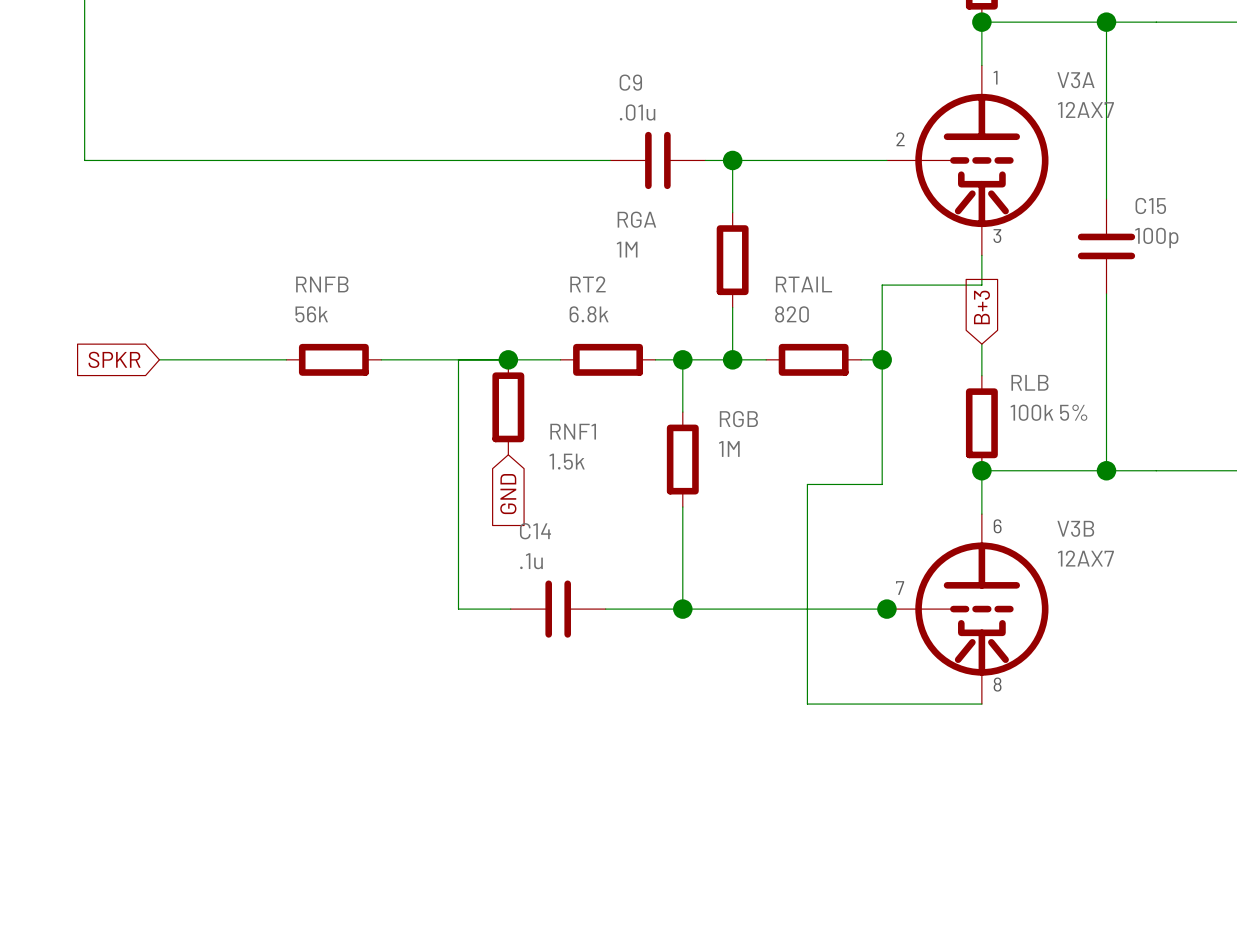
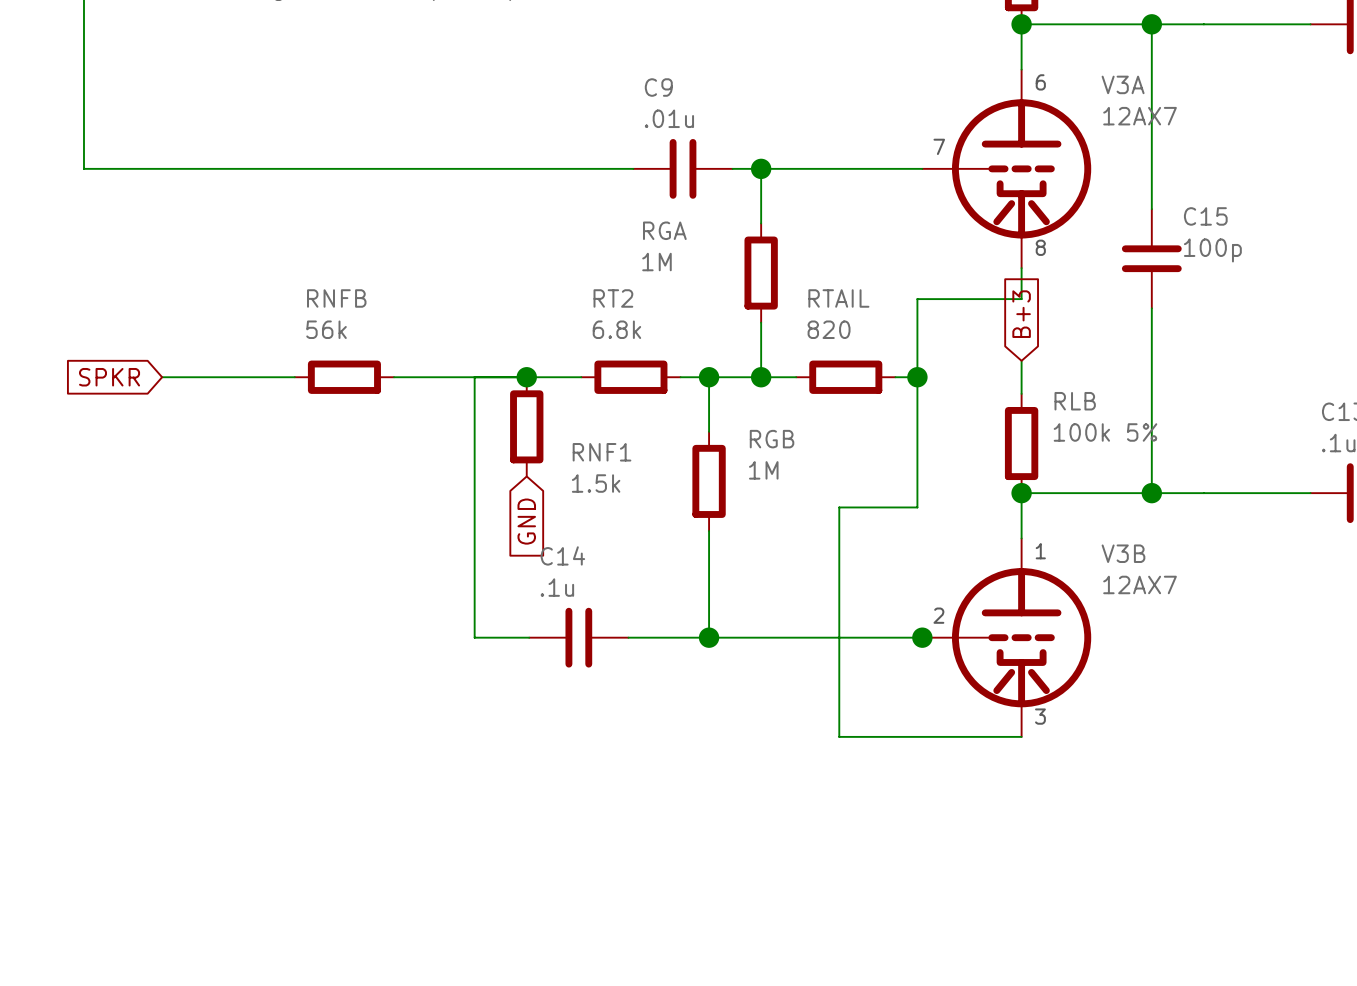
text: 1 (995, 77) -> 6 (1040, 82)
text: 2 (900, 139) -> 7 (939, 146)
text: 3 (997, 236) -> 8 (1040, 247)
text: 6 (997, 526) -> 1 (1040, 551)
text: 7 (900, 588) -> 2 (938, 615)
text: 8 (997, 684) -> 3 (1040, 716)

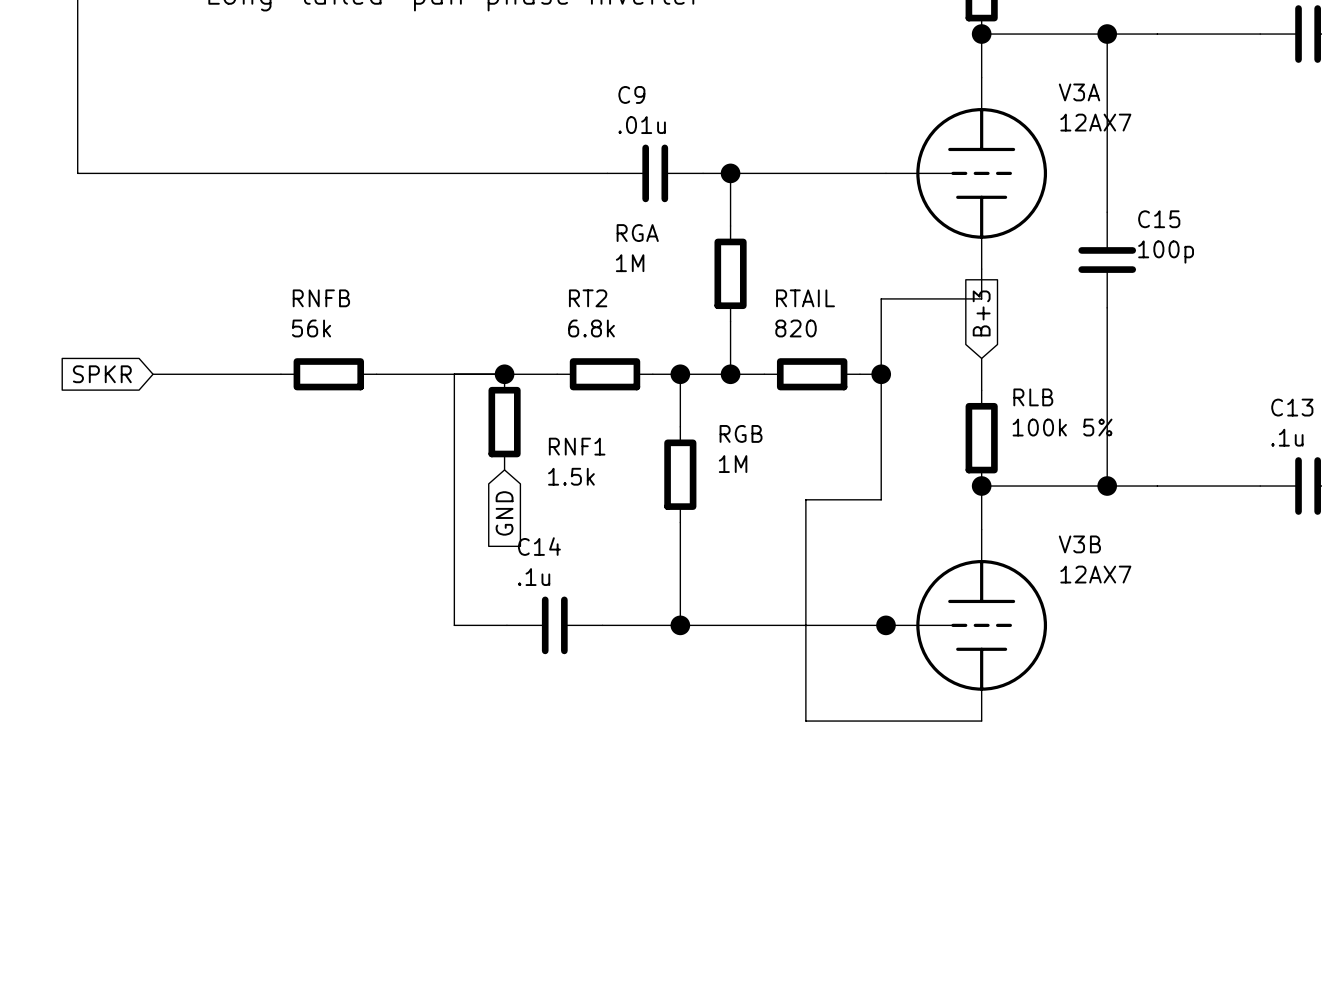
V3A symbol: [922, 69, 1092, 269] -> [885, 77, 1048, 270]
text: 6 (1040, 82) -> none
text: 7 (939, 146) -> none
text: 8 (1040, 247) -> none
V3B symbol: [922, 538, 1092, 737] -> [885, 529, 1048, 722]
text: 1 (1040, 551) -> none
text: 2 (938, 615) -> none
text: 3 (1040, 716) -> none

